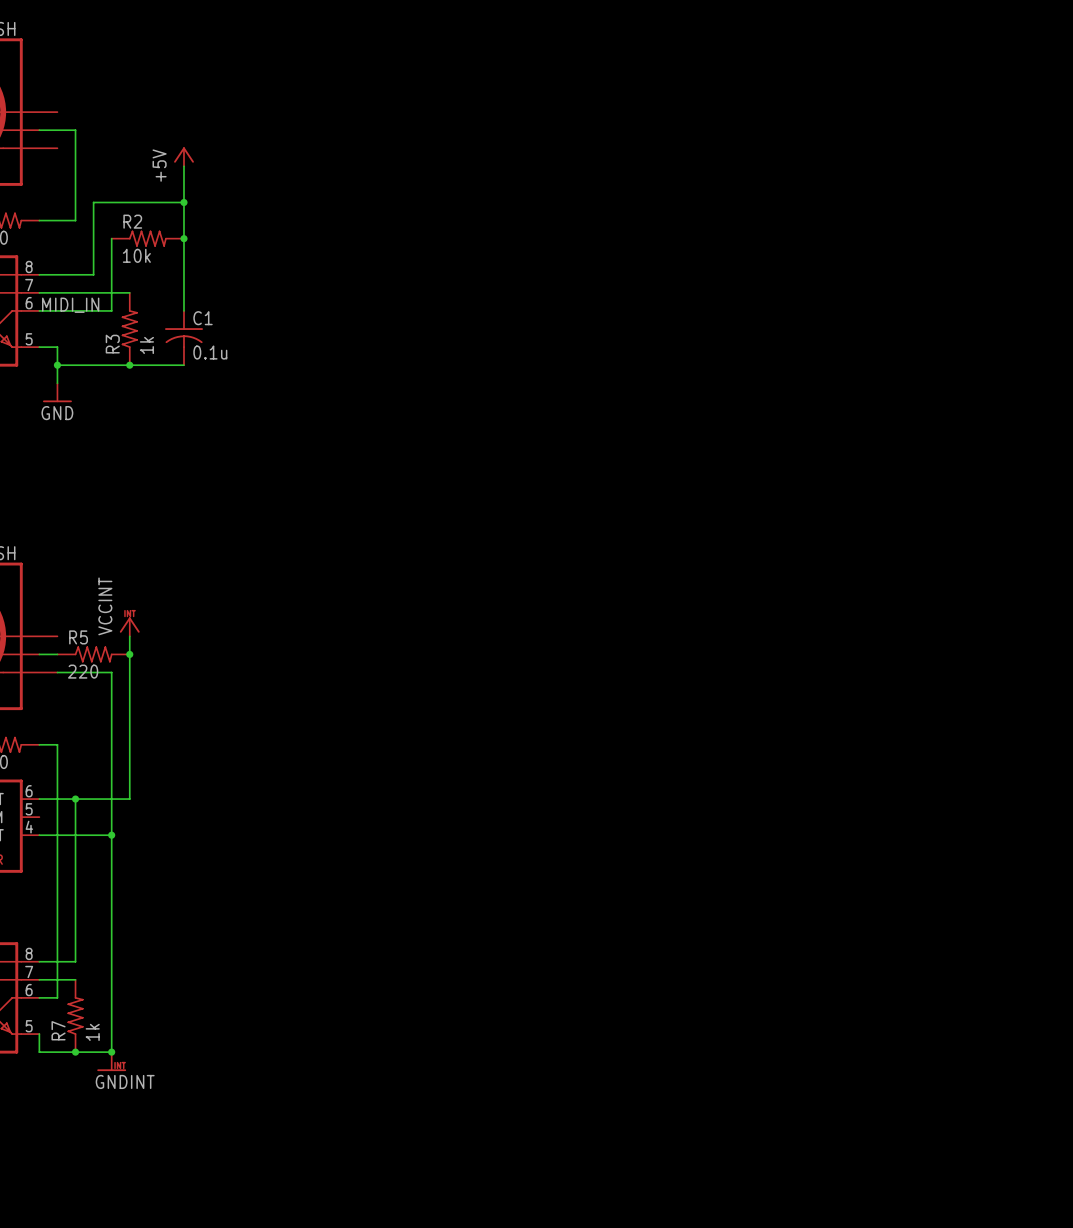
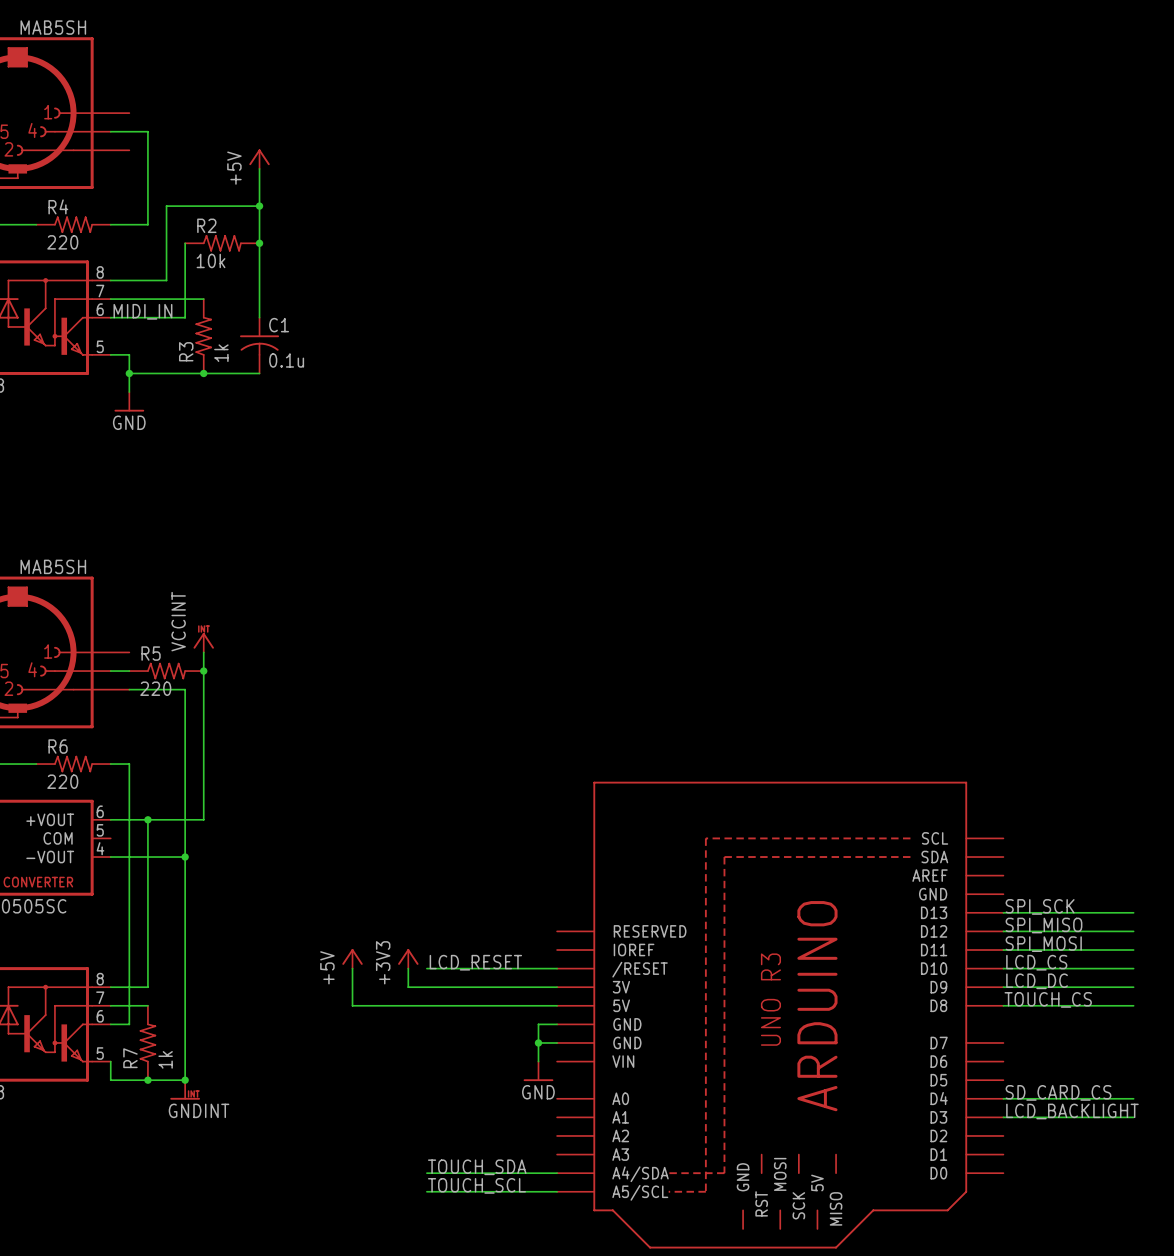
label: none -> SPI_SCK (1040, 906)
wire: none -> (1003, 912) (1133, 912)
label: none -> SPI_MISO (1044, 925)
wire: none -> (1003, 931) (1133, 931)
label: none -> SPI_MOSI (1043, 944)
wire: none -> (1003, 950) (1133, 950)
power symbol: none -> +5V (352, 958)
power symbol: none -> +3V3 (408, 958)
label: none -> LCD_RESET (475, 962)
label: none -> LCD_CS (1036, 962)
wire: none -> (352, 968) (352, 1005) (557, 1005)
wire: none -> (408, 968) (408, 987) (557, 987)
wire: none -> (426, 968) (557, 968)
wire: none -> (1003, 968) (1133, 968)
label: none -> LCD_DC (1037, 981)
wire: none -> (1003, 987) (1133, 987)
label: none -> TOUCH_CS (1048, 999)
wire: none -> (1003, 1005) (1133, 1005)
part: none -> (780, 1015)
wire: none -> (557, 1024) (538, 1024) (538, 1061)
wire: none -> (538, 1042) (557, 1042)
junction: none -> (538, 1042)
power symbol: none -> GND (538, 1071)
label: none -> SD_CARD_CS (1058, 1092)
wire: none -> (1003, 1098) (1133, 1098)
label: none -> LCD_BACKLIGHT (1072, 1111)
wire: none -> (1003, 1117) (1133, 1117)
label: none -> TOUCH_SDA (477, 1167)
wire: none -> (426, 1173) (557, 1173)
label: none -> TOUCH_SCL (476, 1185)
wire: none -> (426, 1191) (557, 1191)

